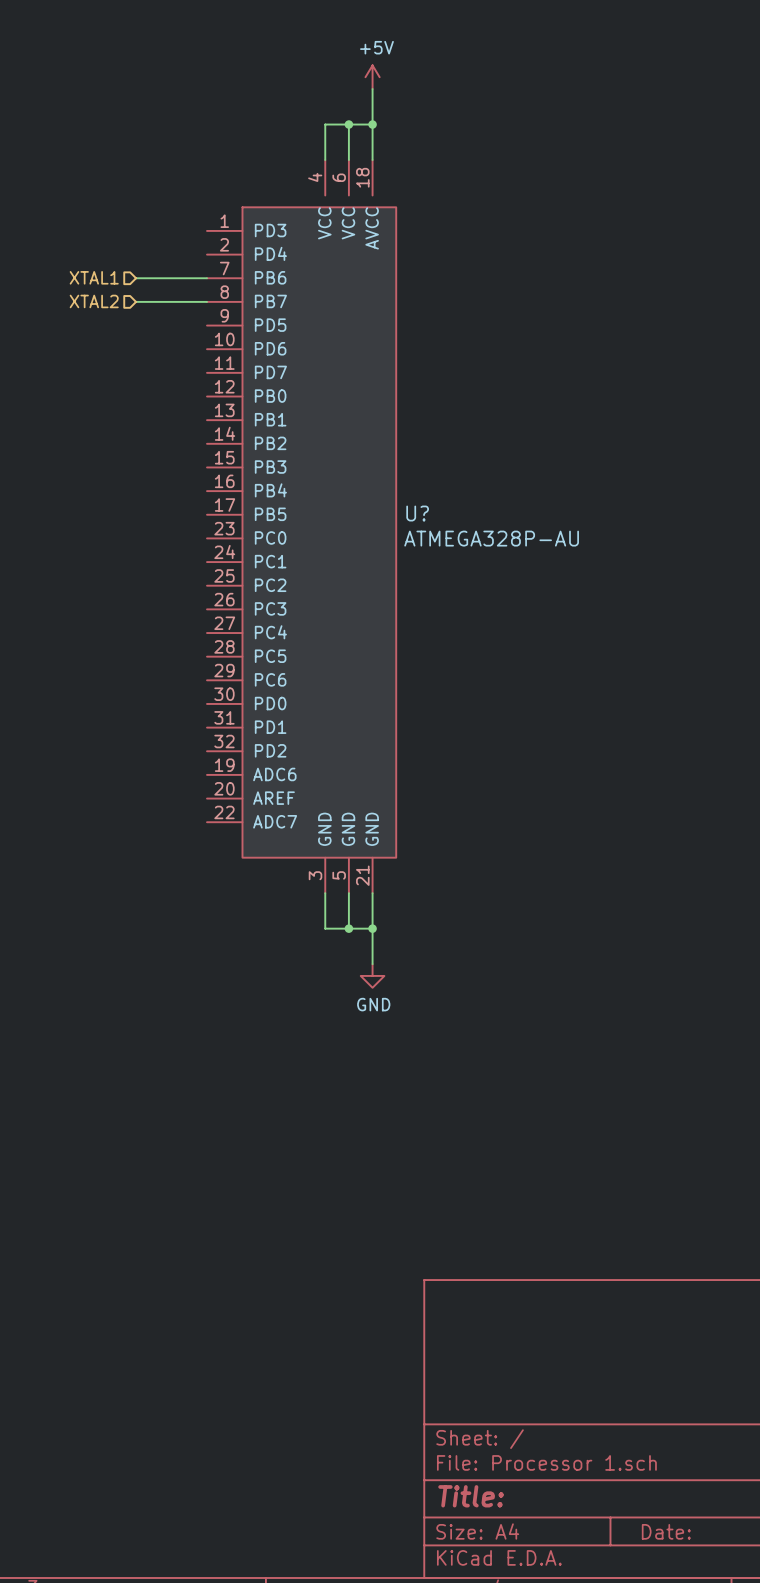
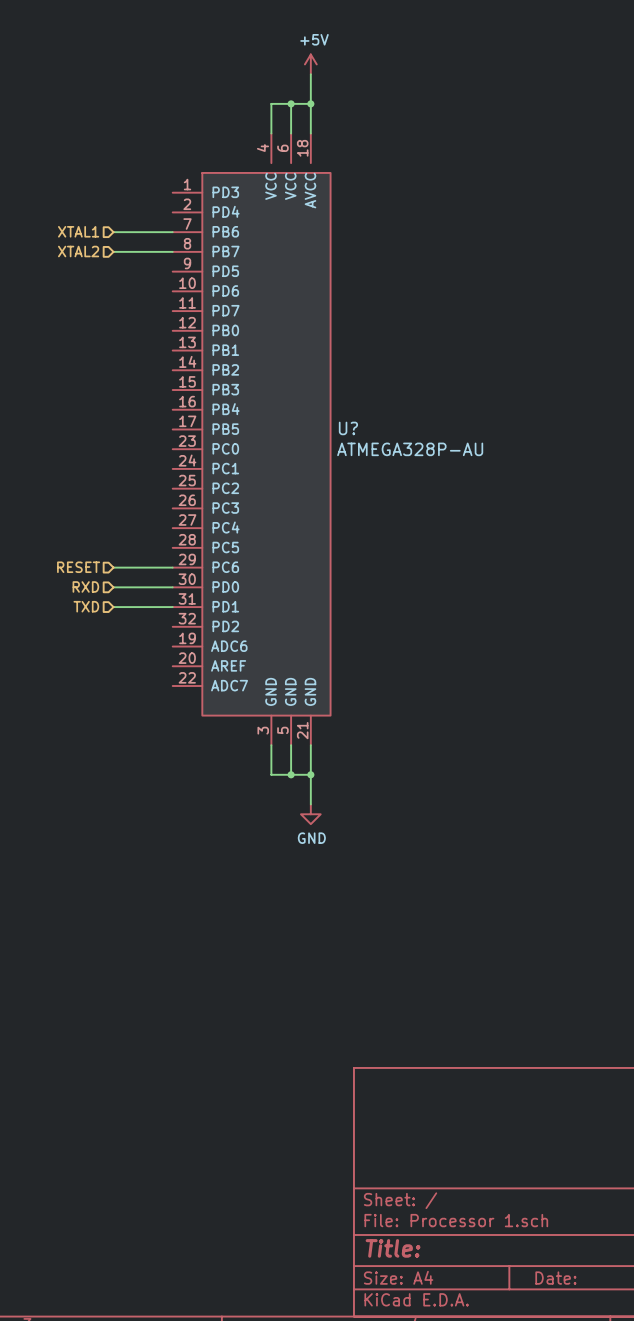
hierarchical label: none -> RESET (78, 567)
wire: none -> (113, 567) (172, 567)
hierarchical label: none -> RXD (85, 586)
wire: none -> (113, 587) (172, 587)
hierarchical label: none -> TXD (86, 606)
wire: none -> (113, 607) (172, 607)

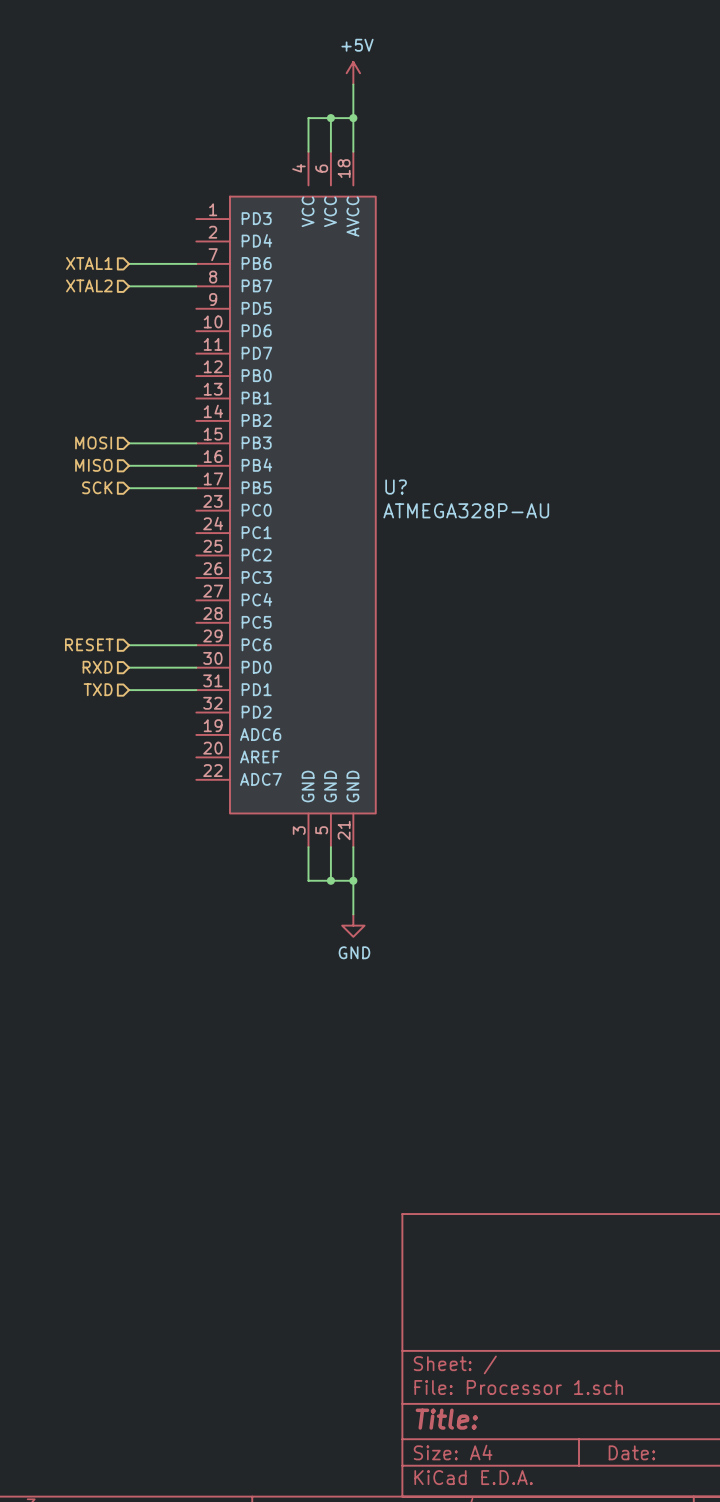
hierarchical label: none -> MOSI (93, 442)
wire: none -> (129, 443) (196, 443)
hierarchical label: none -> MISO (93, 465)
wire: none -> (129, 465) (196, 465)
hierarchical label: none -> SCK (97, 487)
wire: none -> (129, 488) (196, 488)

